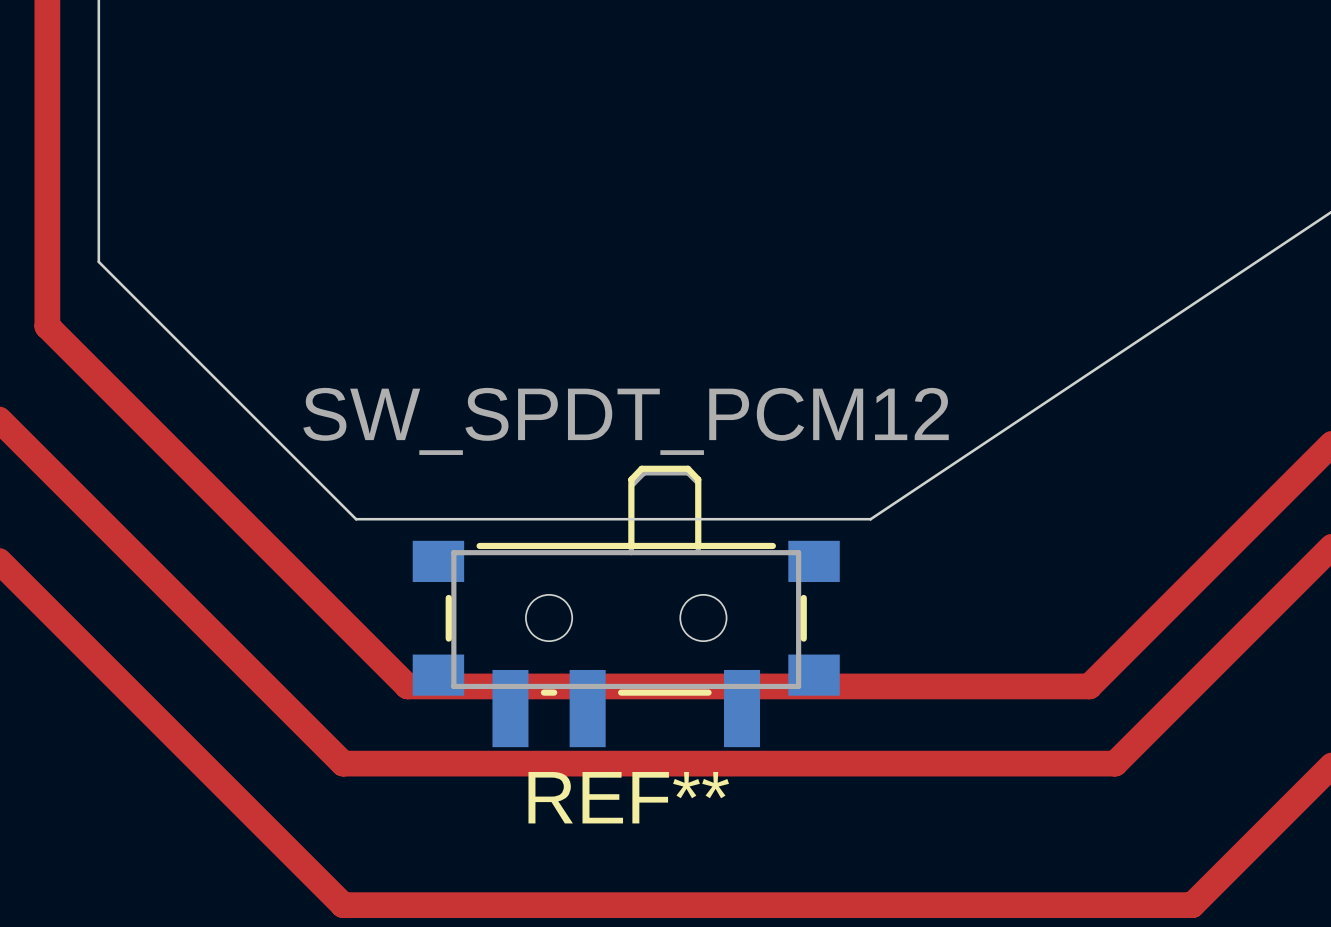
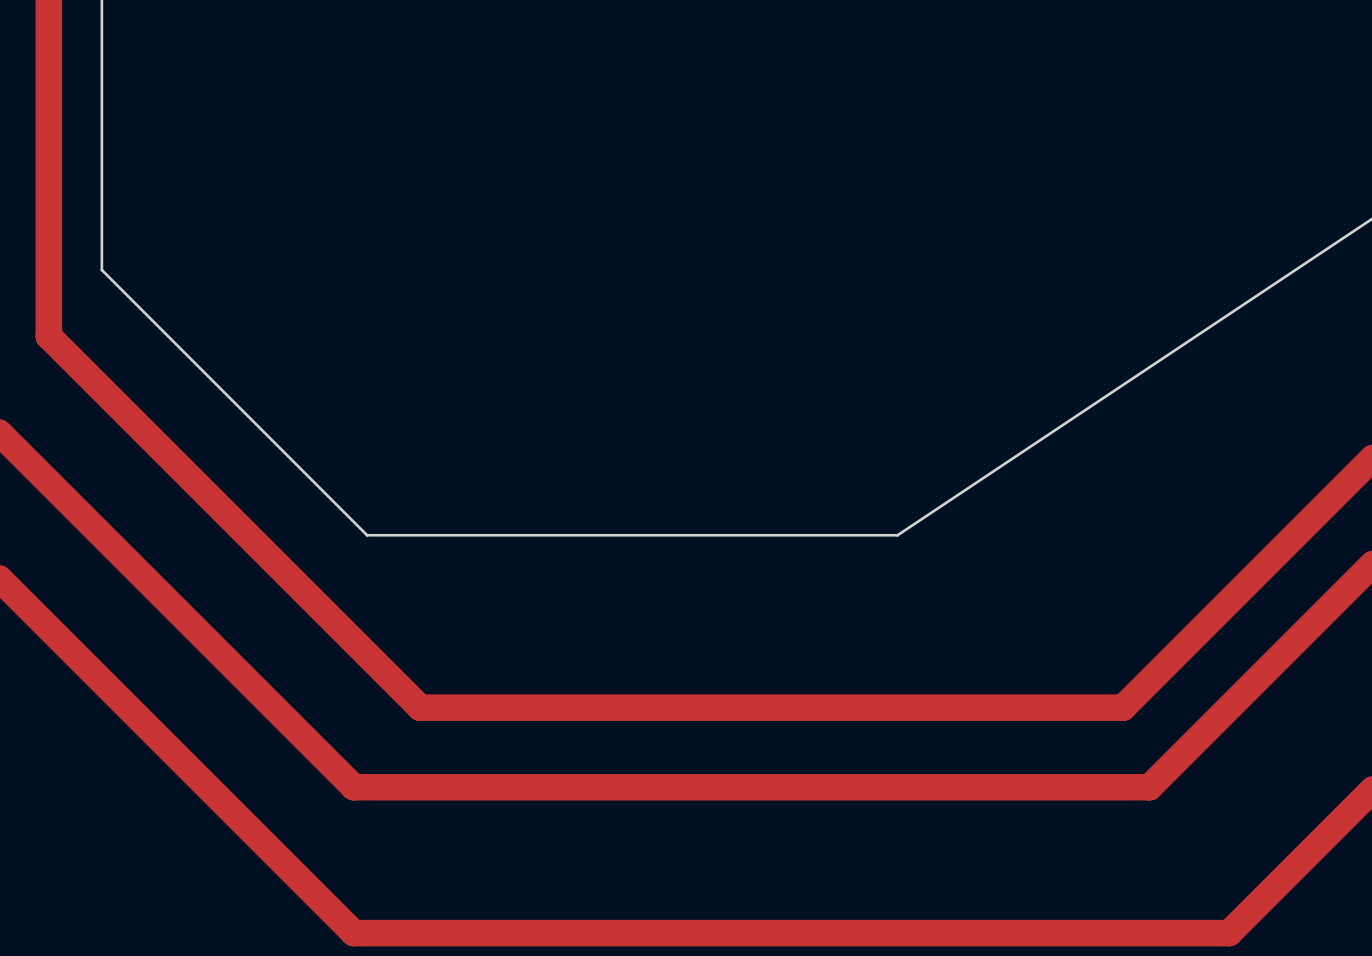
REF**: SW_SPDT_PCM12 (626, 606) -> none

